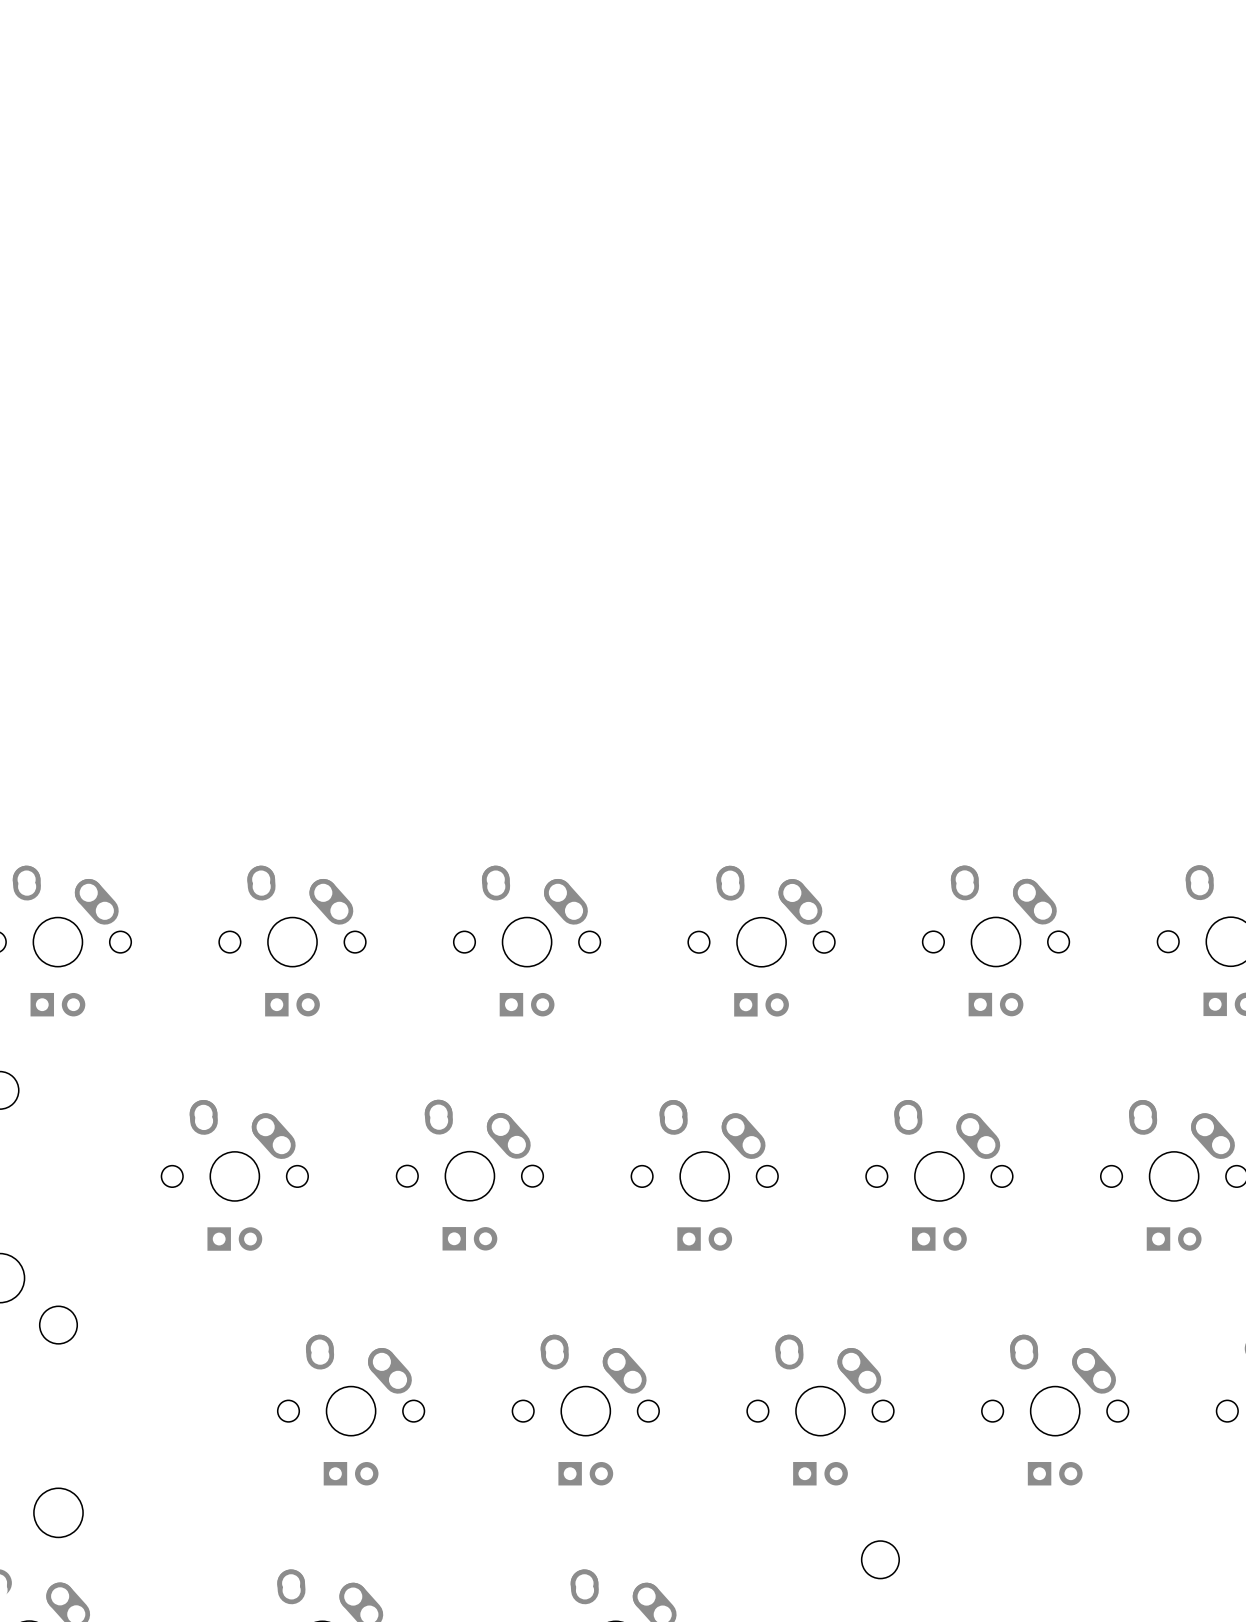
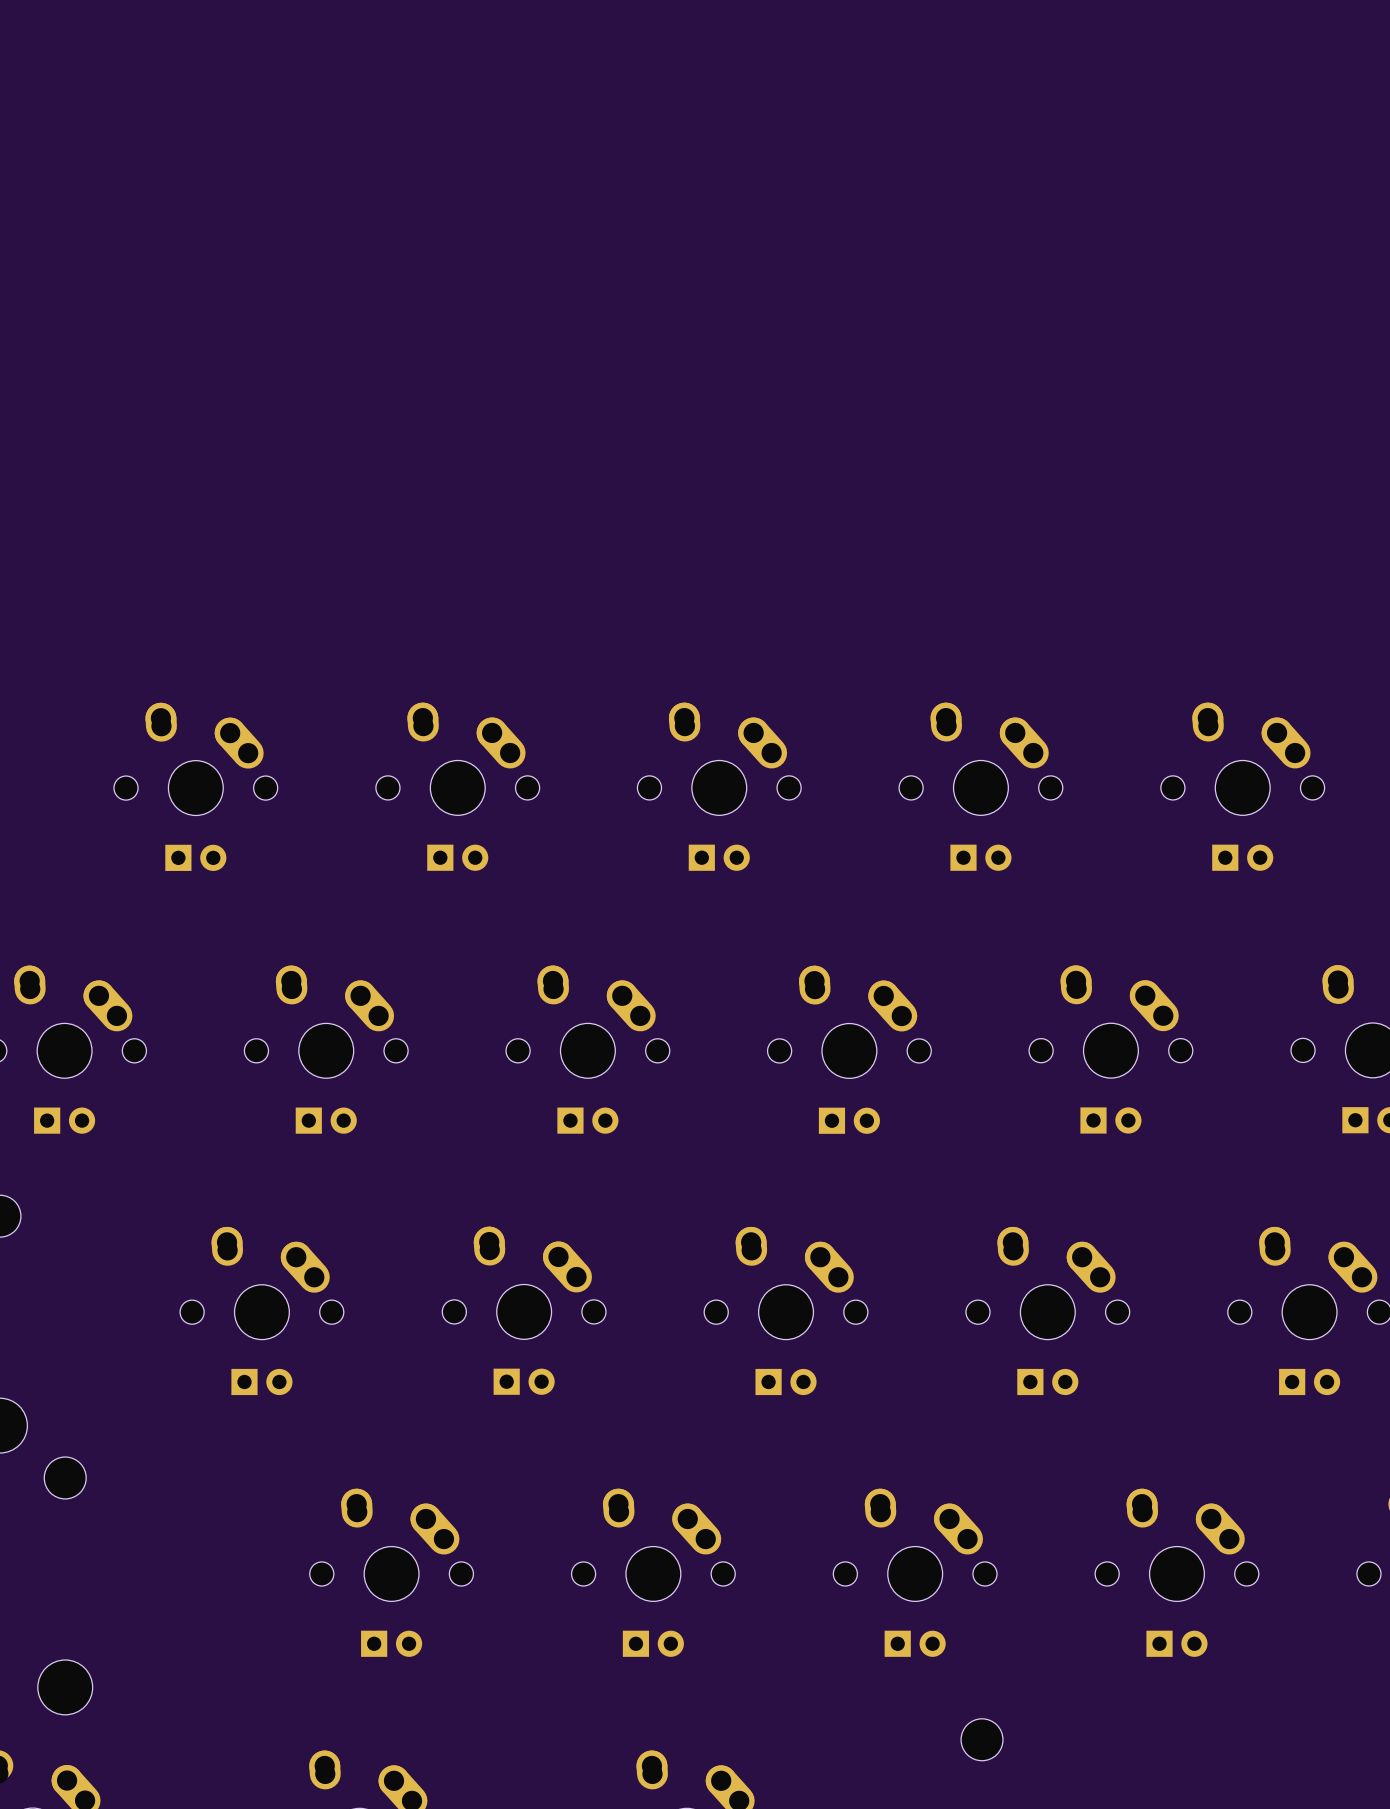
part: none -> (195, 786)
part: none -> (457, 786)
part: none -> (719, 786)
part: none -> (980, 786)
part: none -> (1242, 786)

